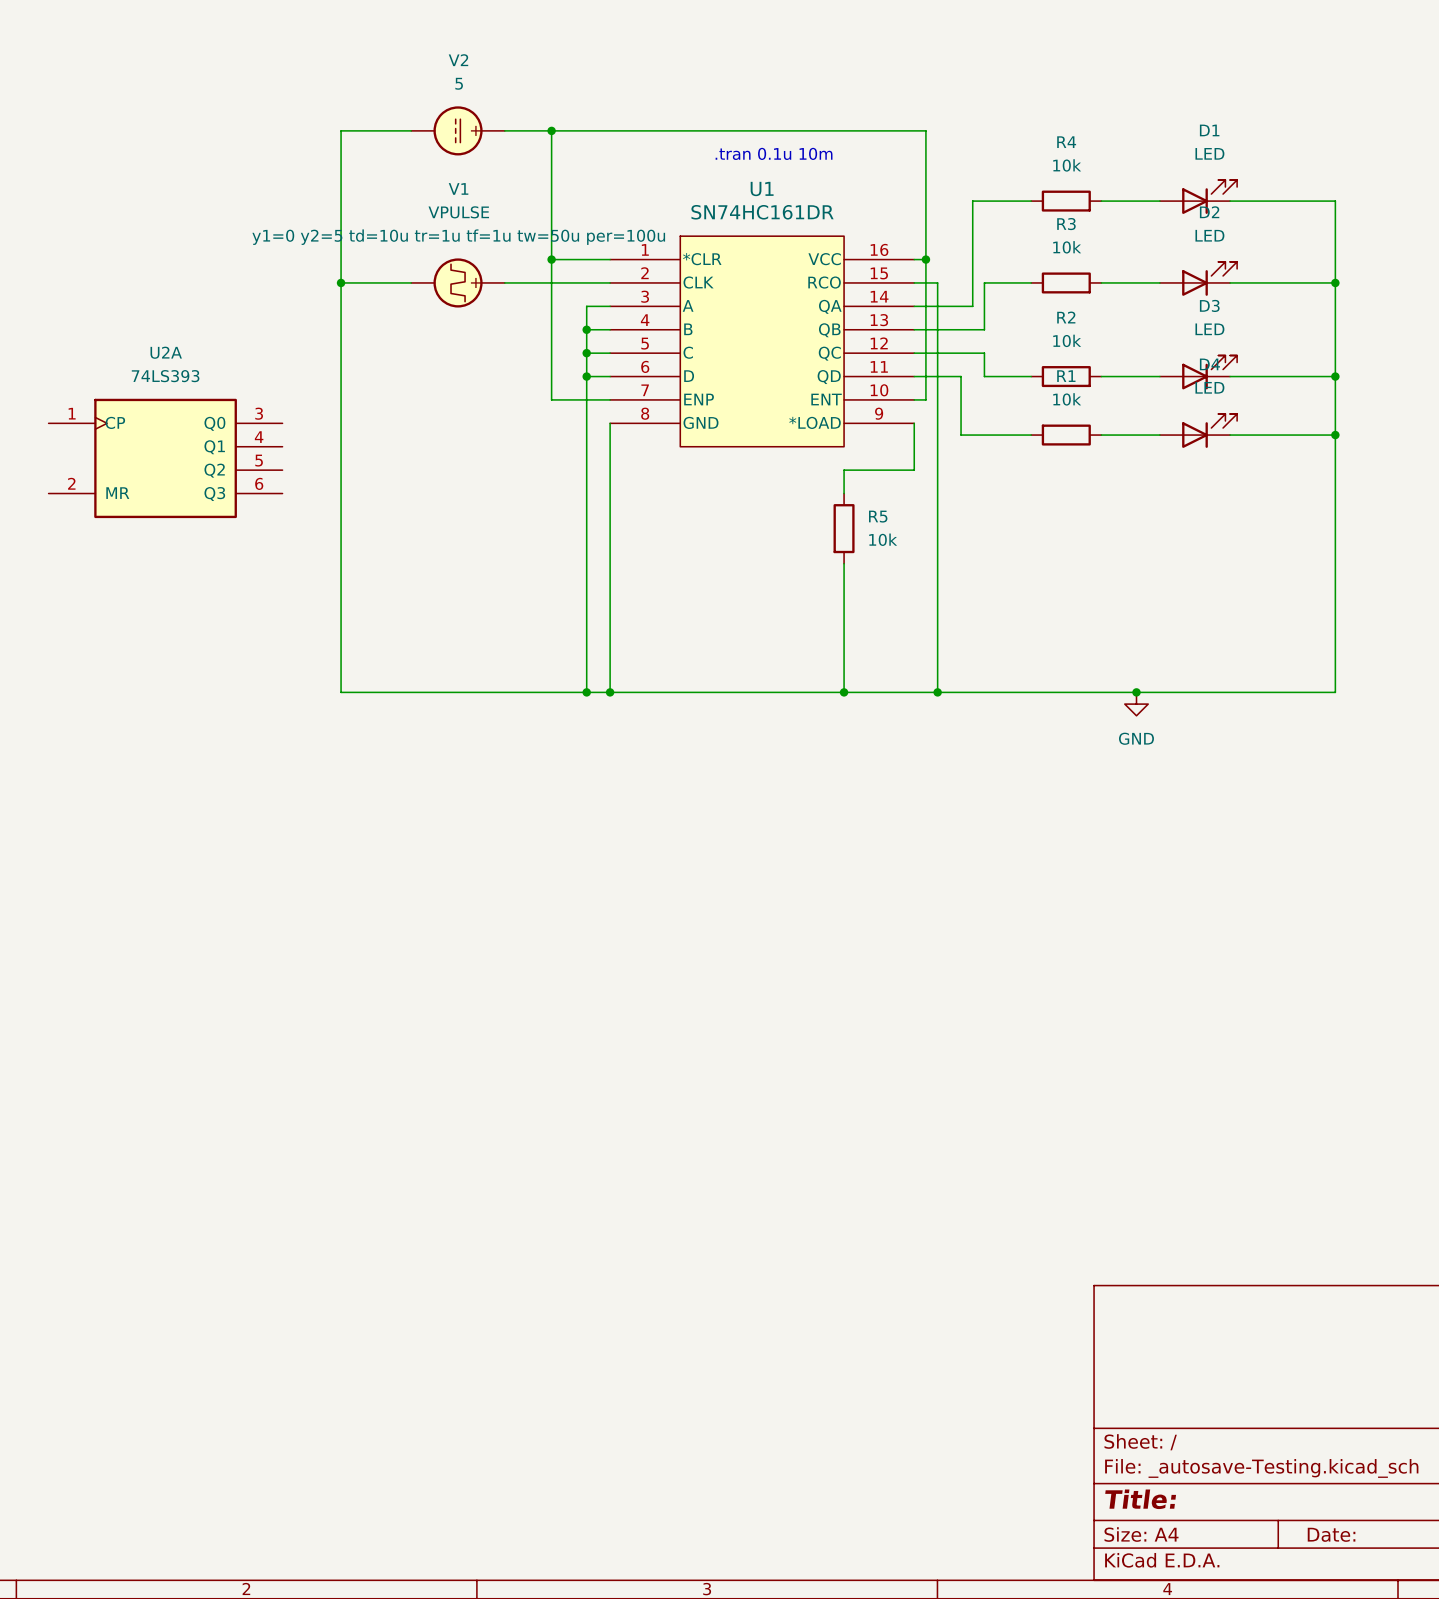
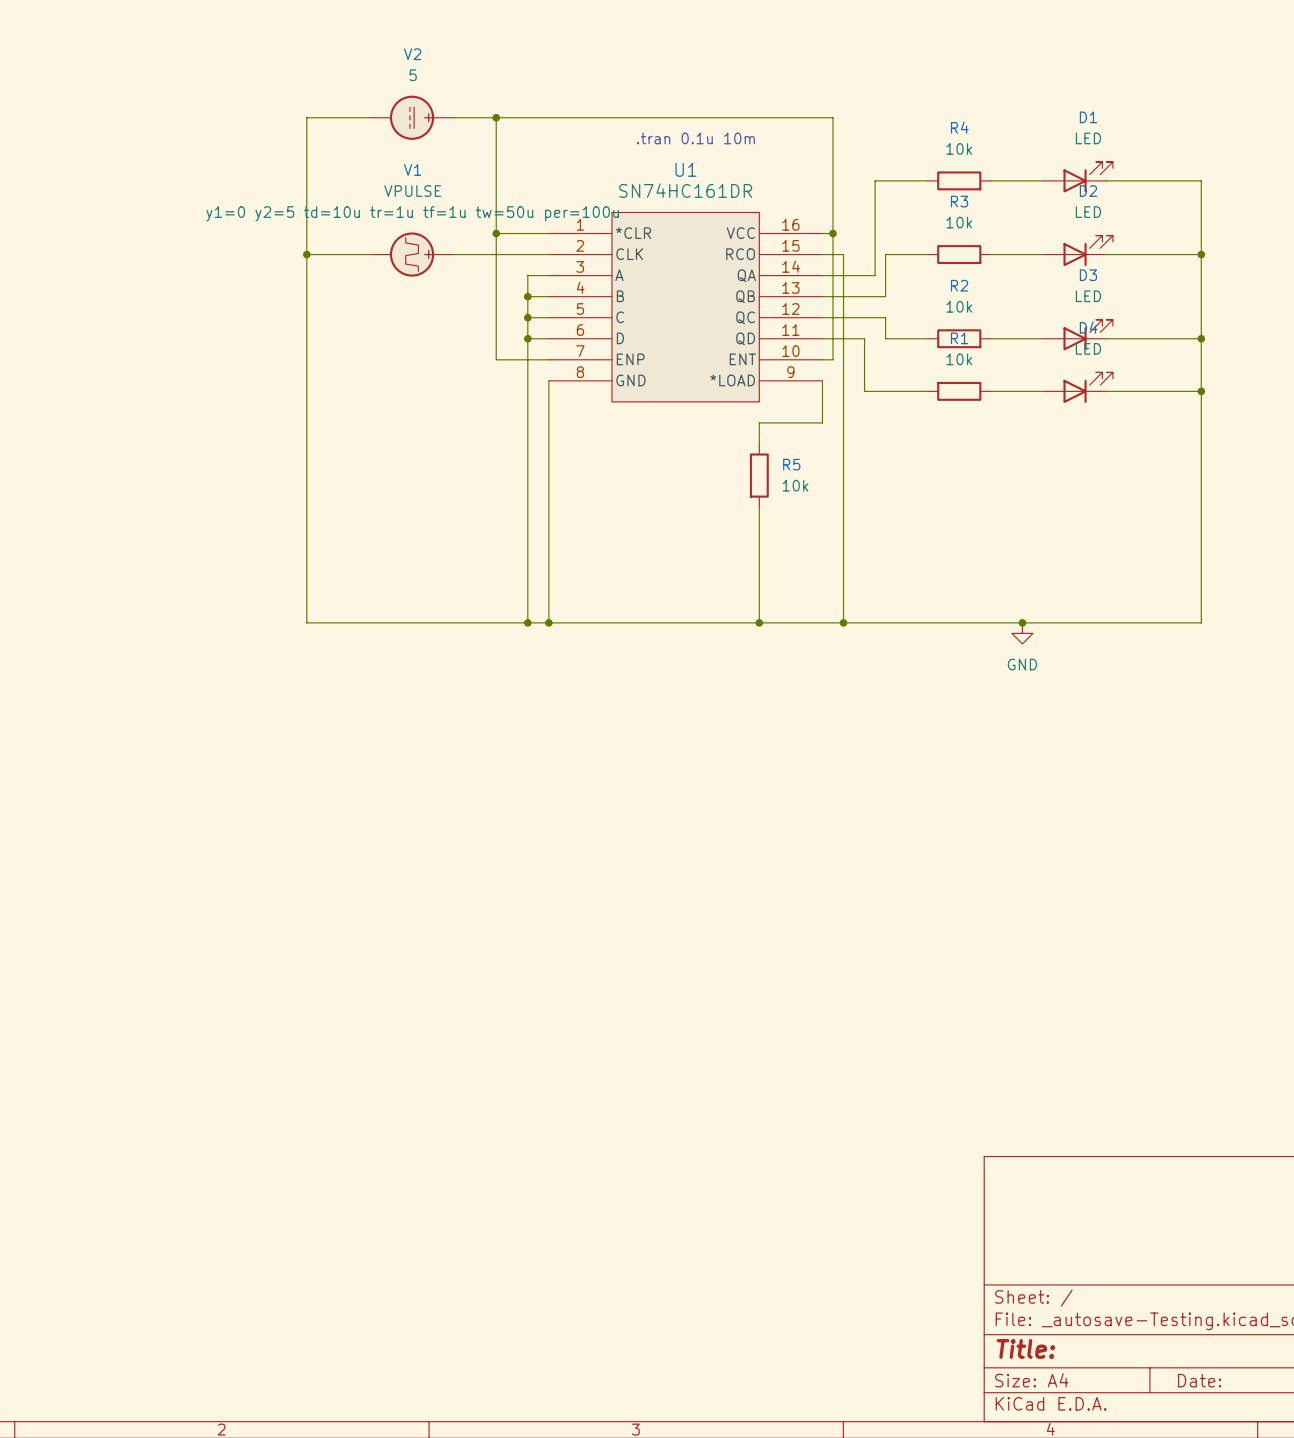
U2A: 74LS393 (165, 458) -> none

